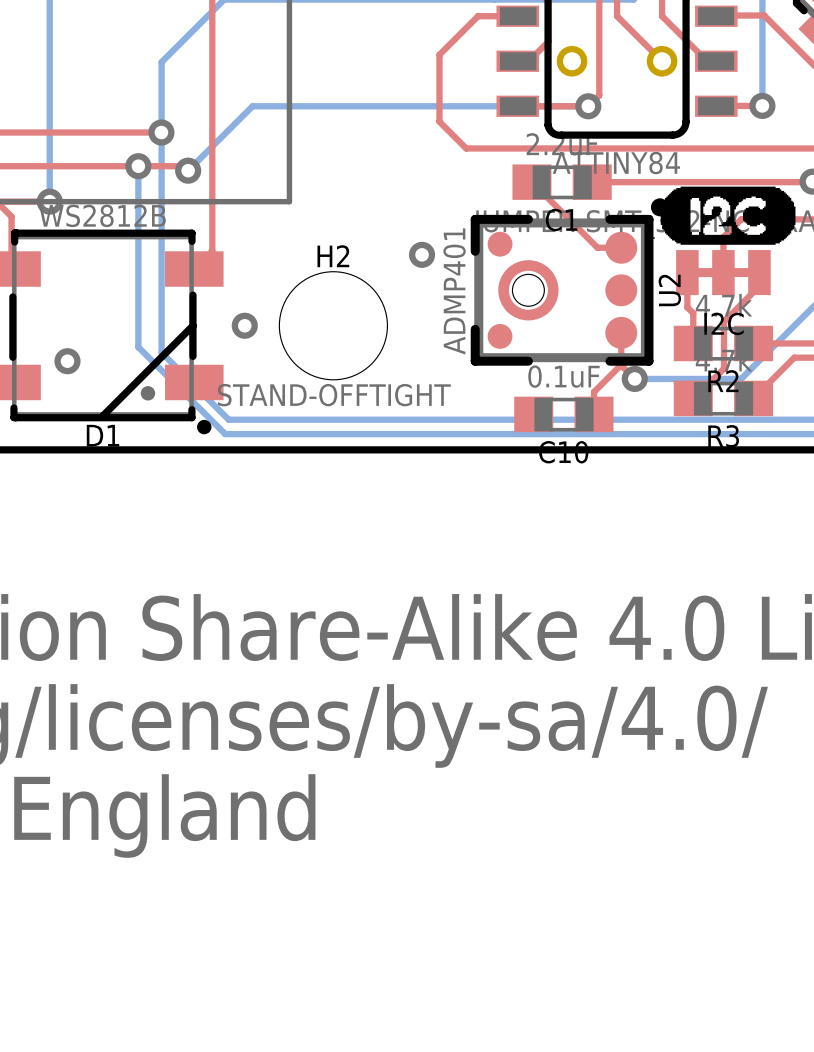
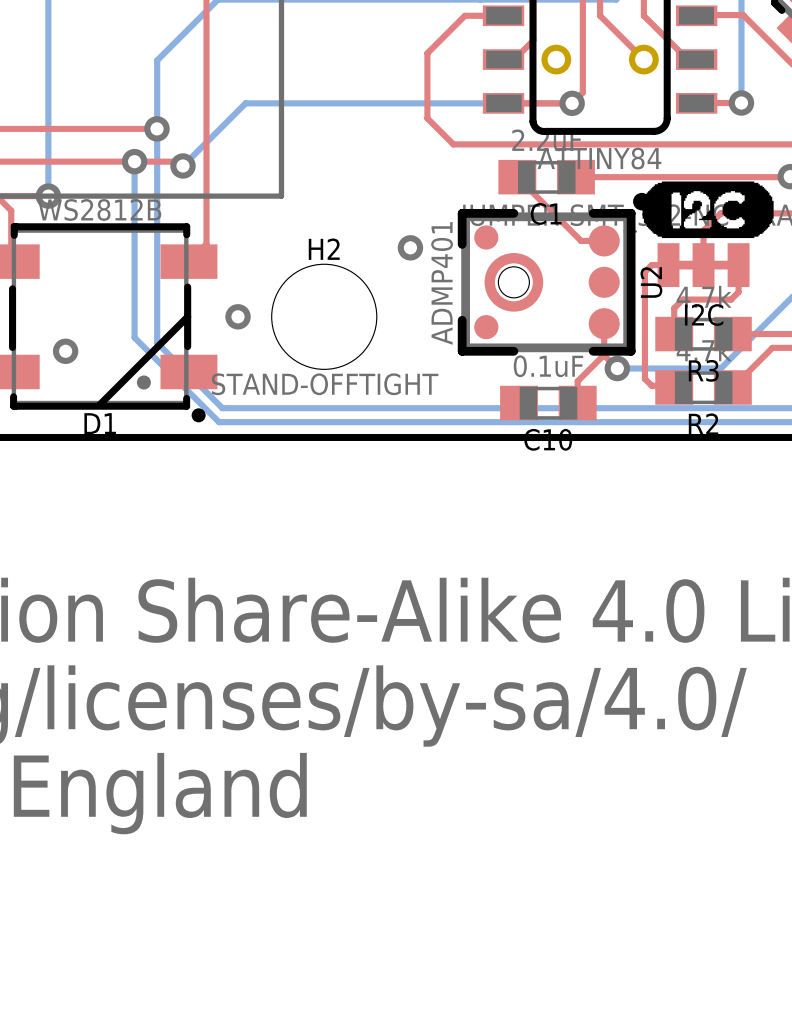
top track: (687, 272) (687, 307) (693, 313) (693, 316) -> (738, 278) (738, 292) (731, 299) (682, 299) (674, 308)
top track: none -> (668, 265) (651, 265) (644, 271) (644, 378) (651, 385) (674, 385)
top track: (759, 286) (724, 321) (724, 368) (693, 398) -> none
R2 name: R2 (723, 381) -> R3 (703, 370)
R3 name: R3 (723, 436) -> R2 (703, 424)

